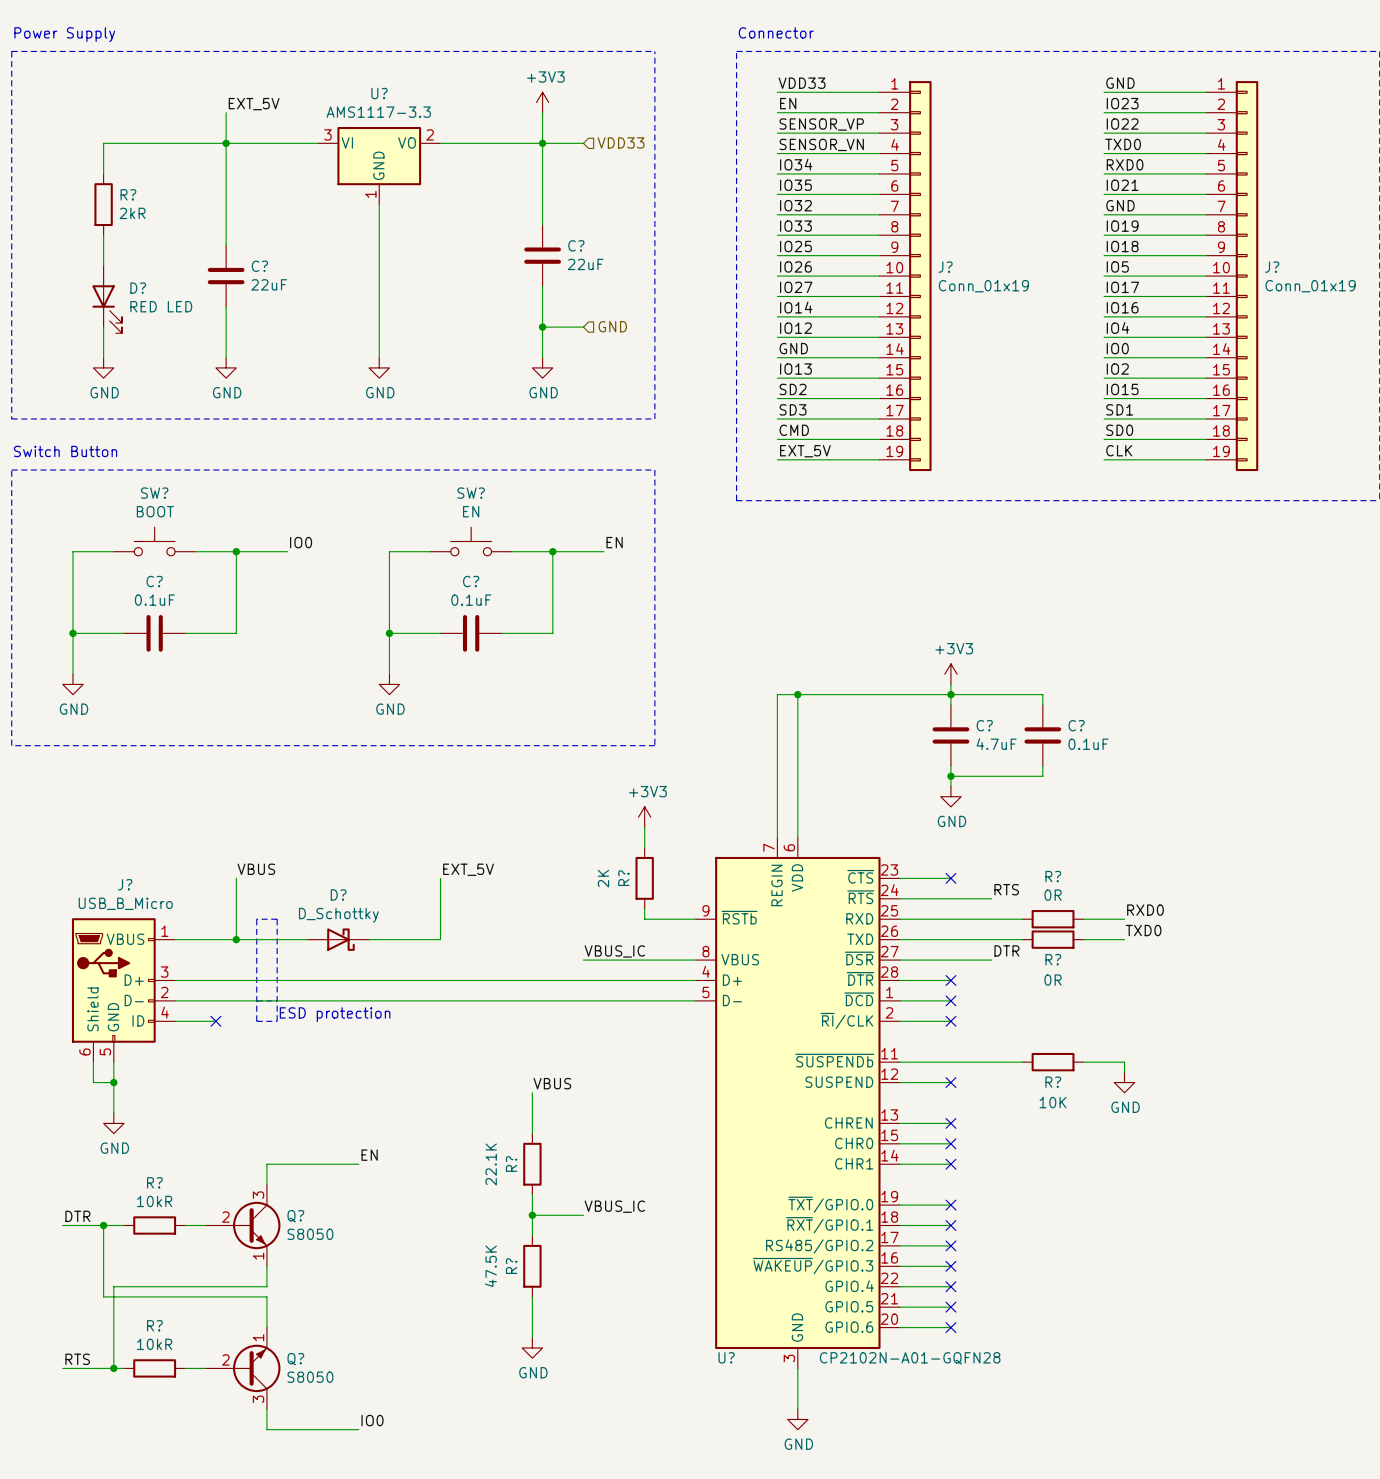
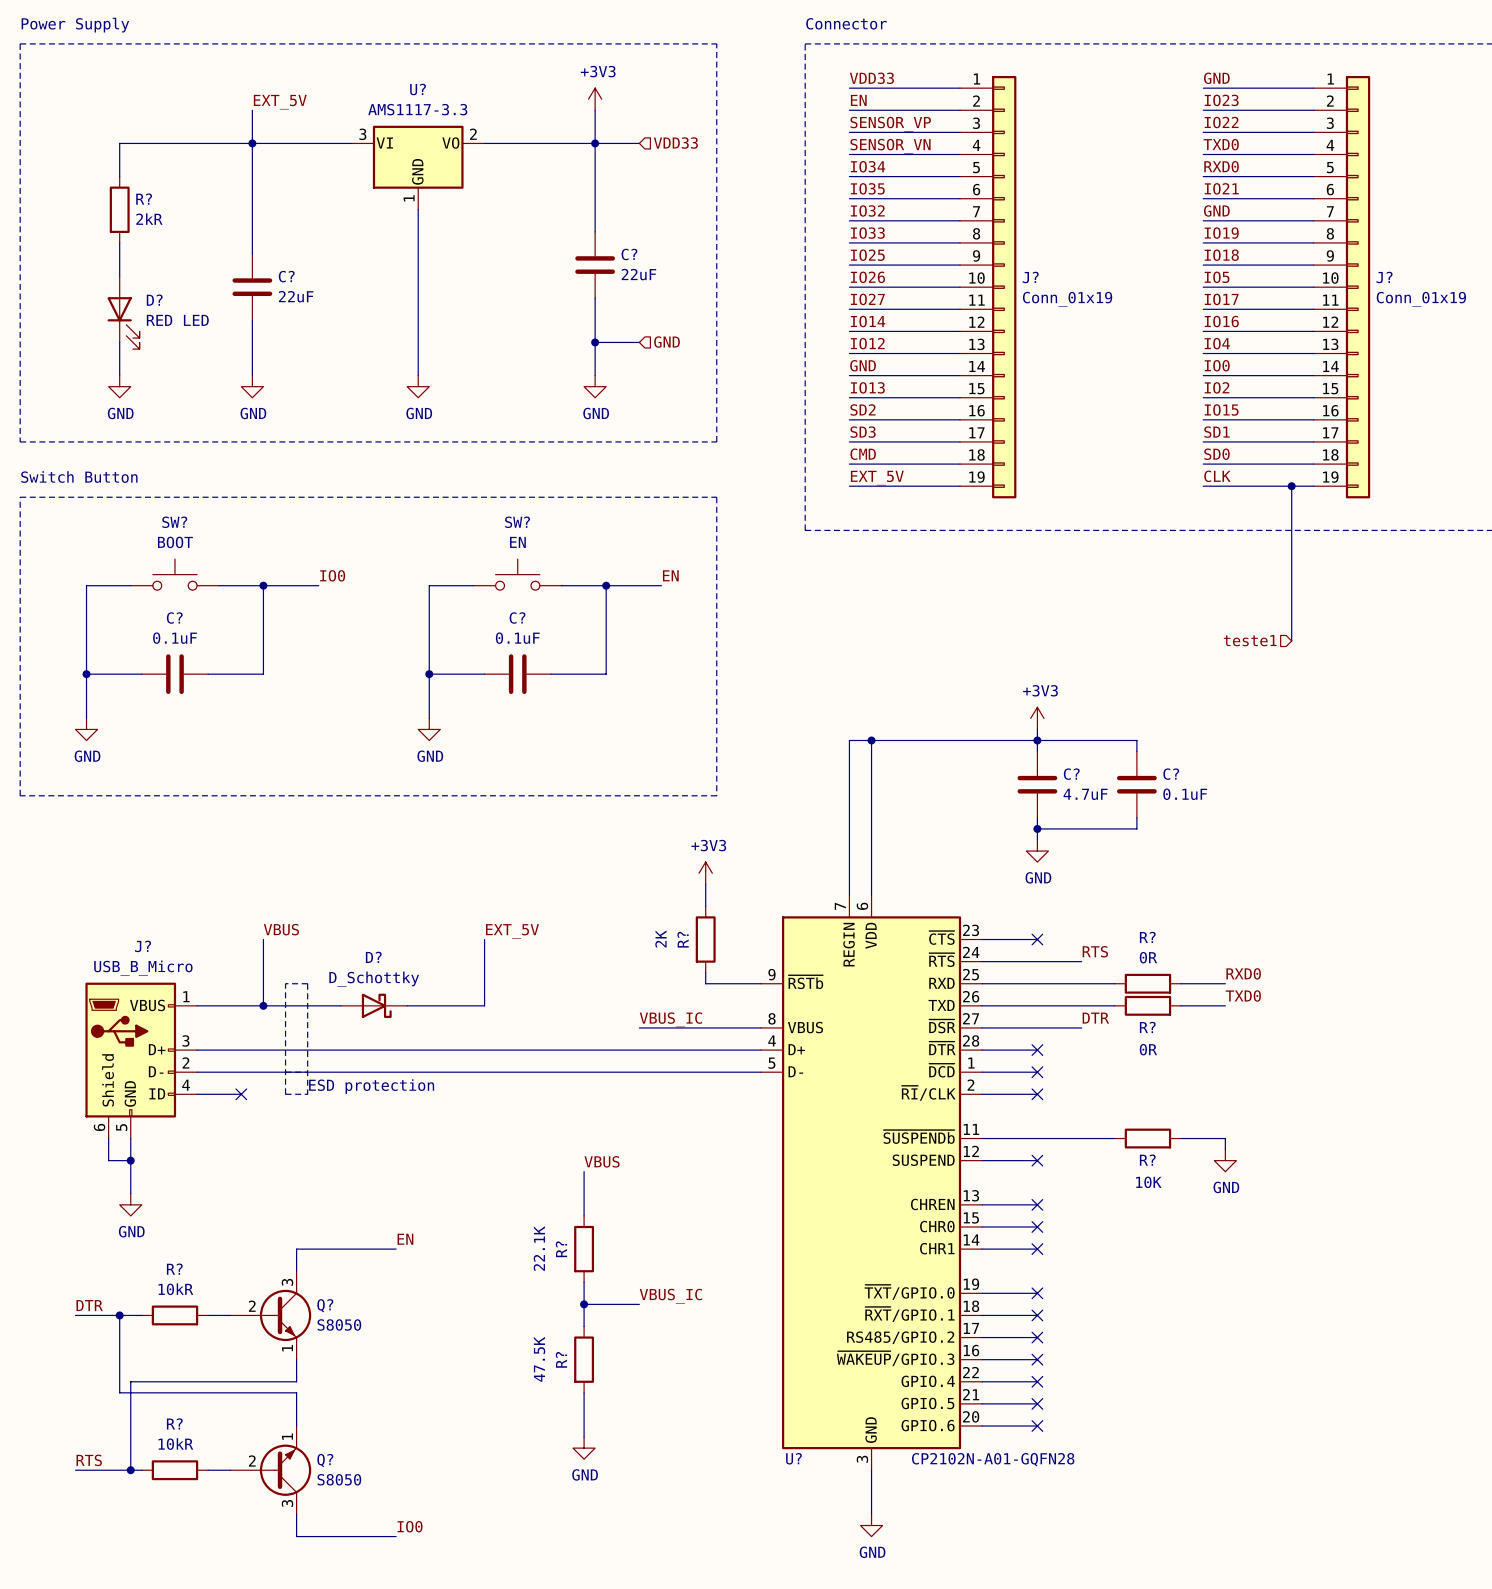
wire: none -> (1291, 486) (1291, 640)
junction: none -> (1291, 486)
hierarchical label: none -> teste1 (1250, 640)

